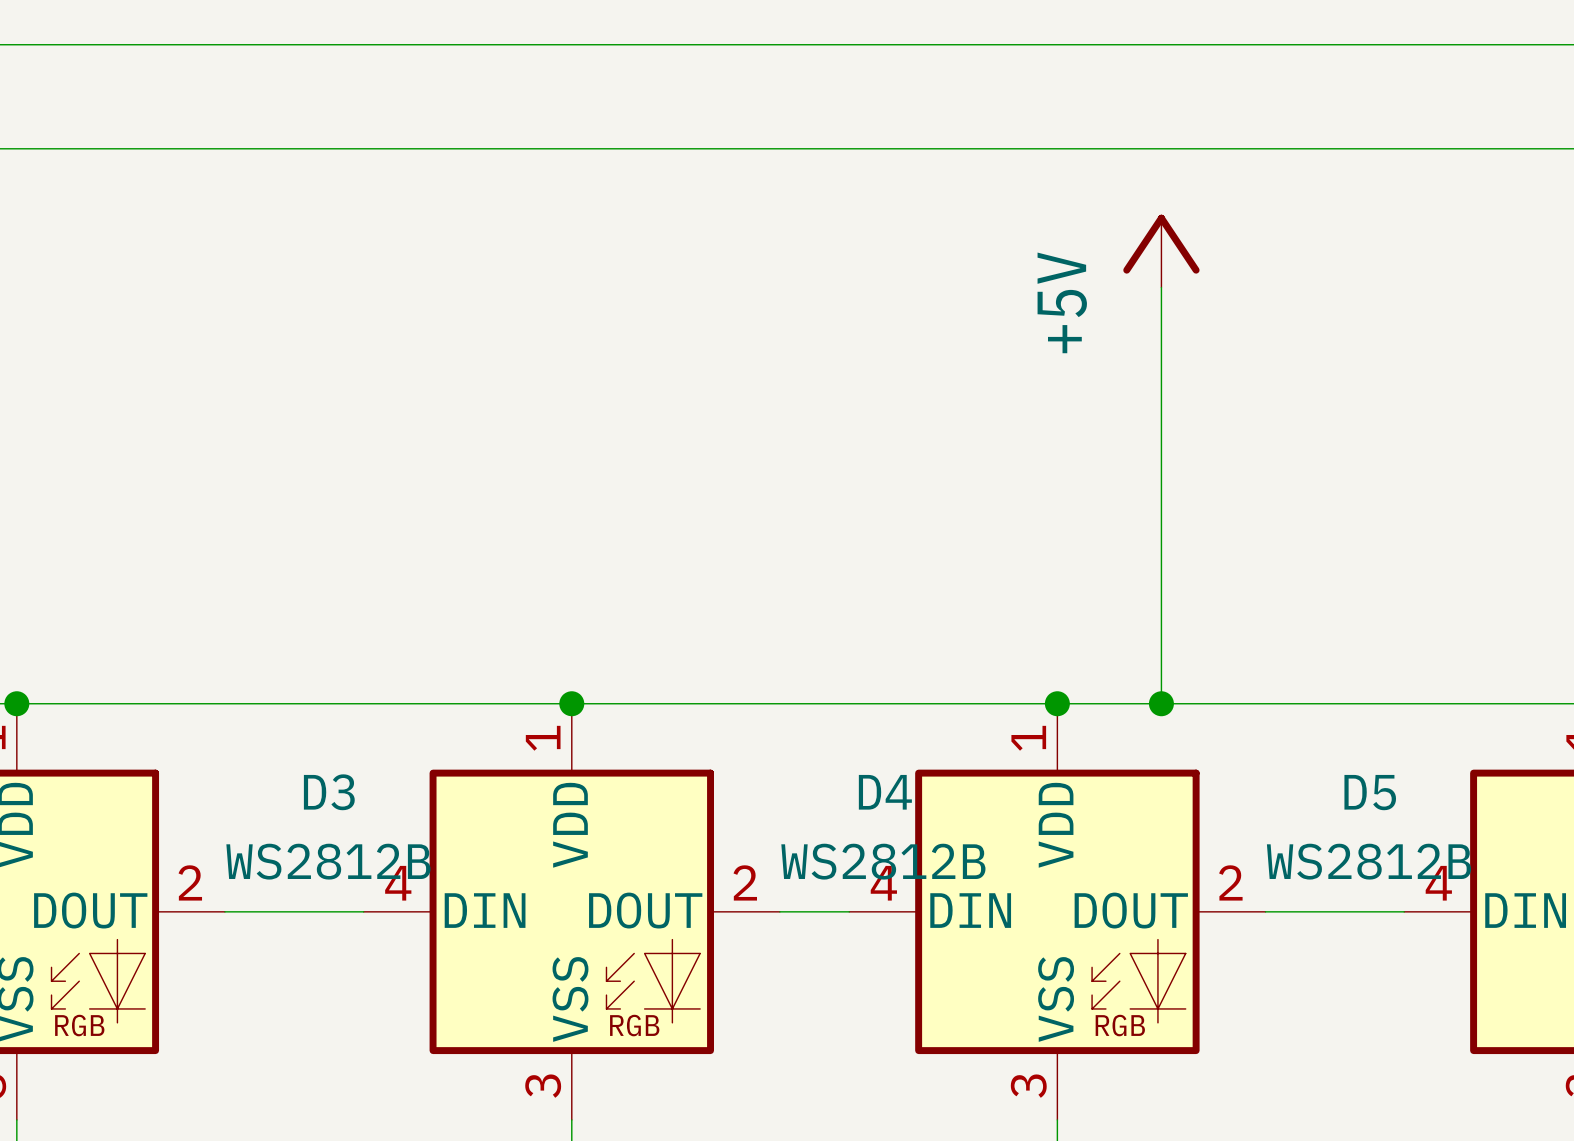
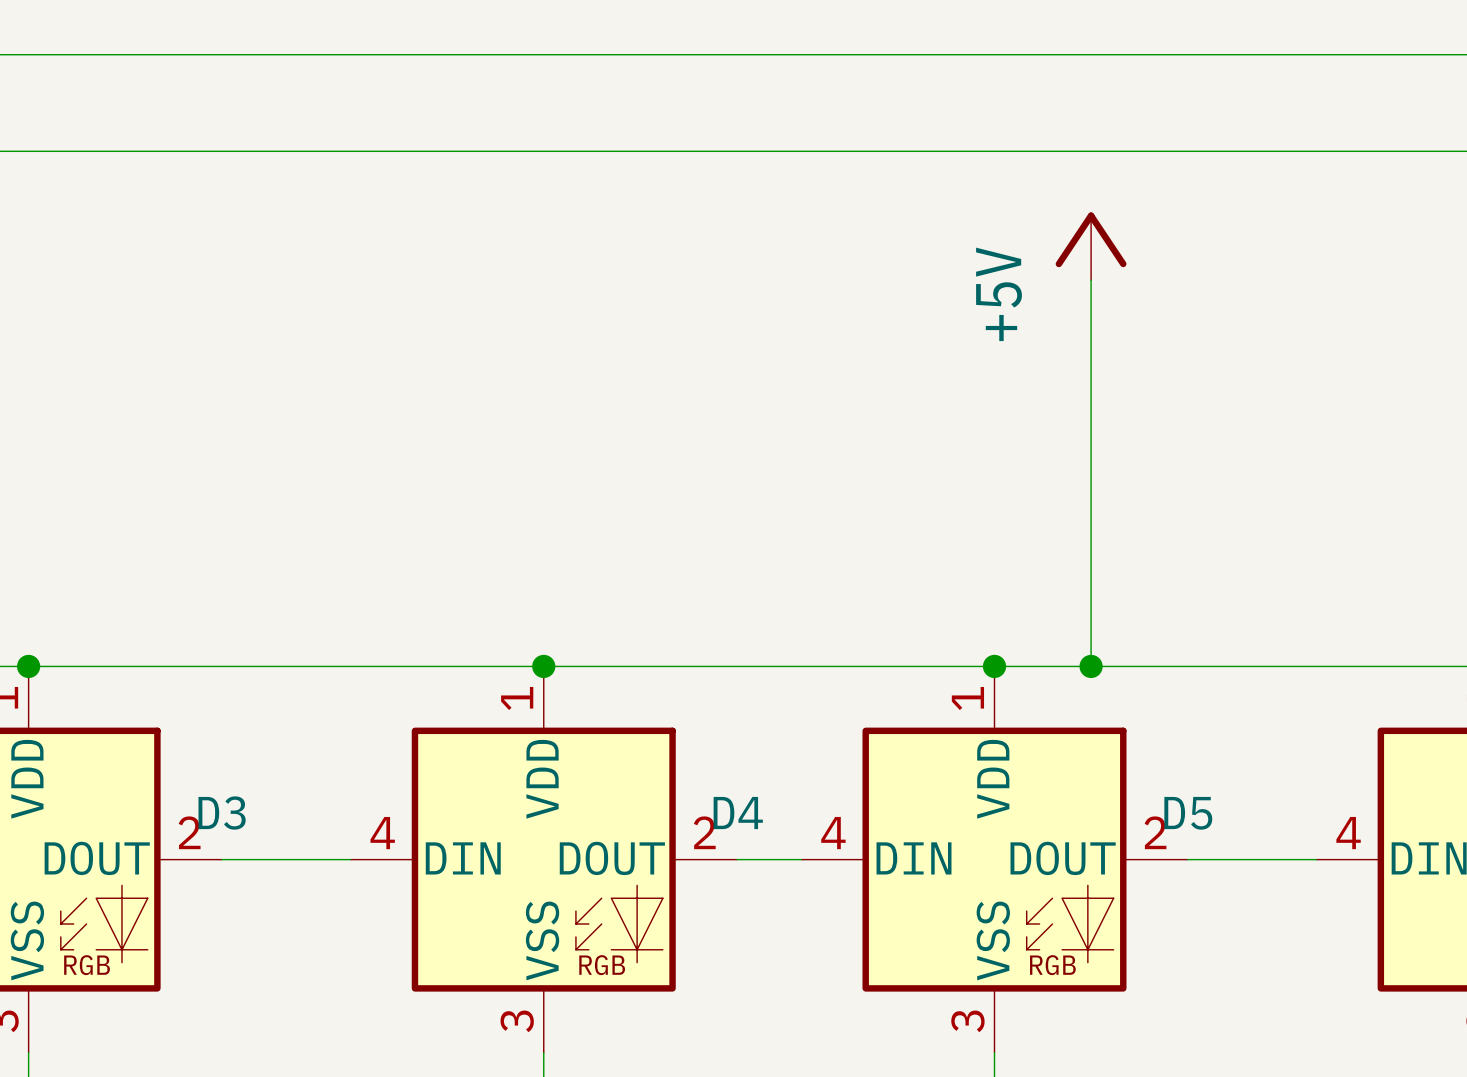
D3 name position: D3 (329, 792) -> D3 (222, 813)
D4 name position: D4 (885, 792) -> D4 (738, 813)
D5 name position: D5 (1370, 792) -> D5 (1188, 813)
D3 value: WS2812B (328, 861) -> none
D4 value: WS2812B (883, 861) -> none
D5 value: WS2812B (1368, 861) -> none

